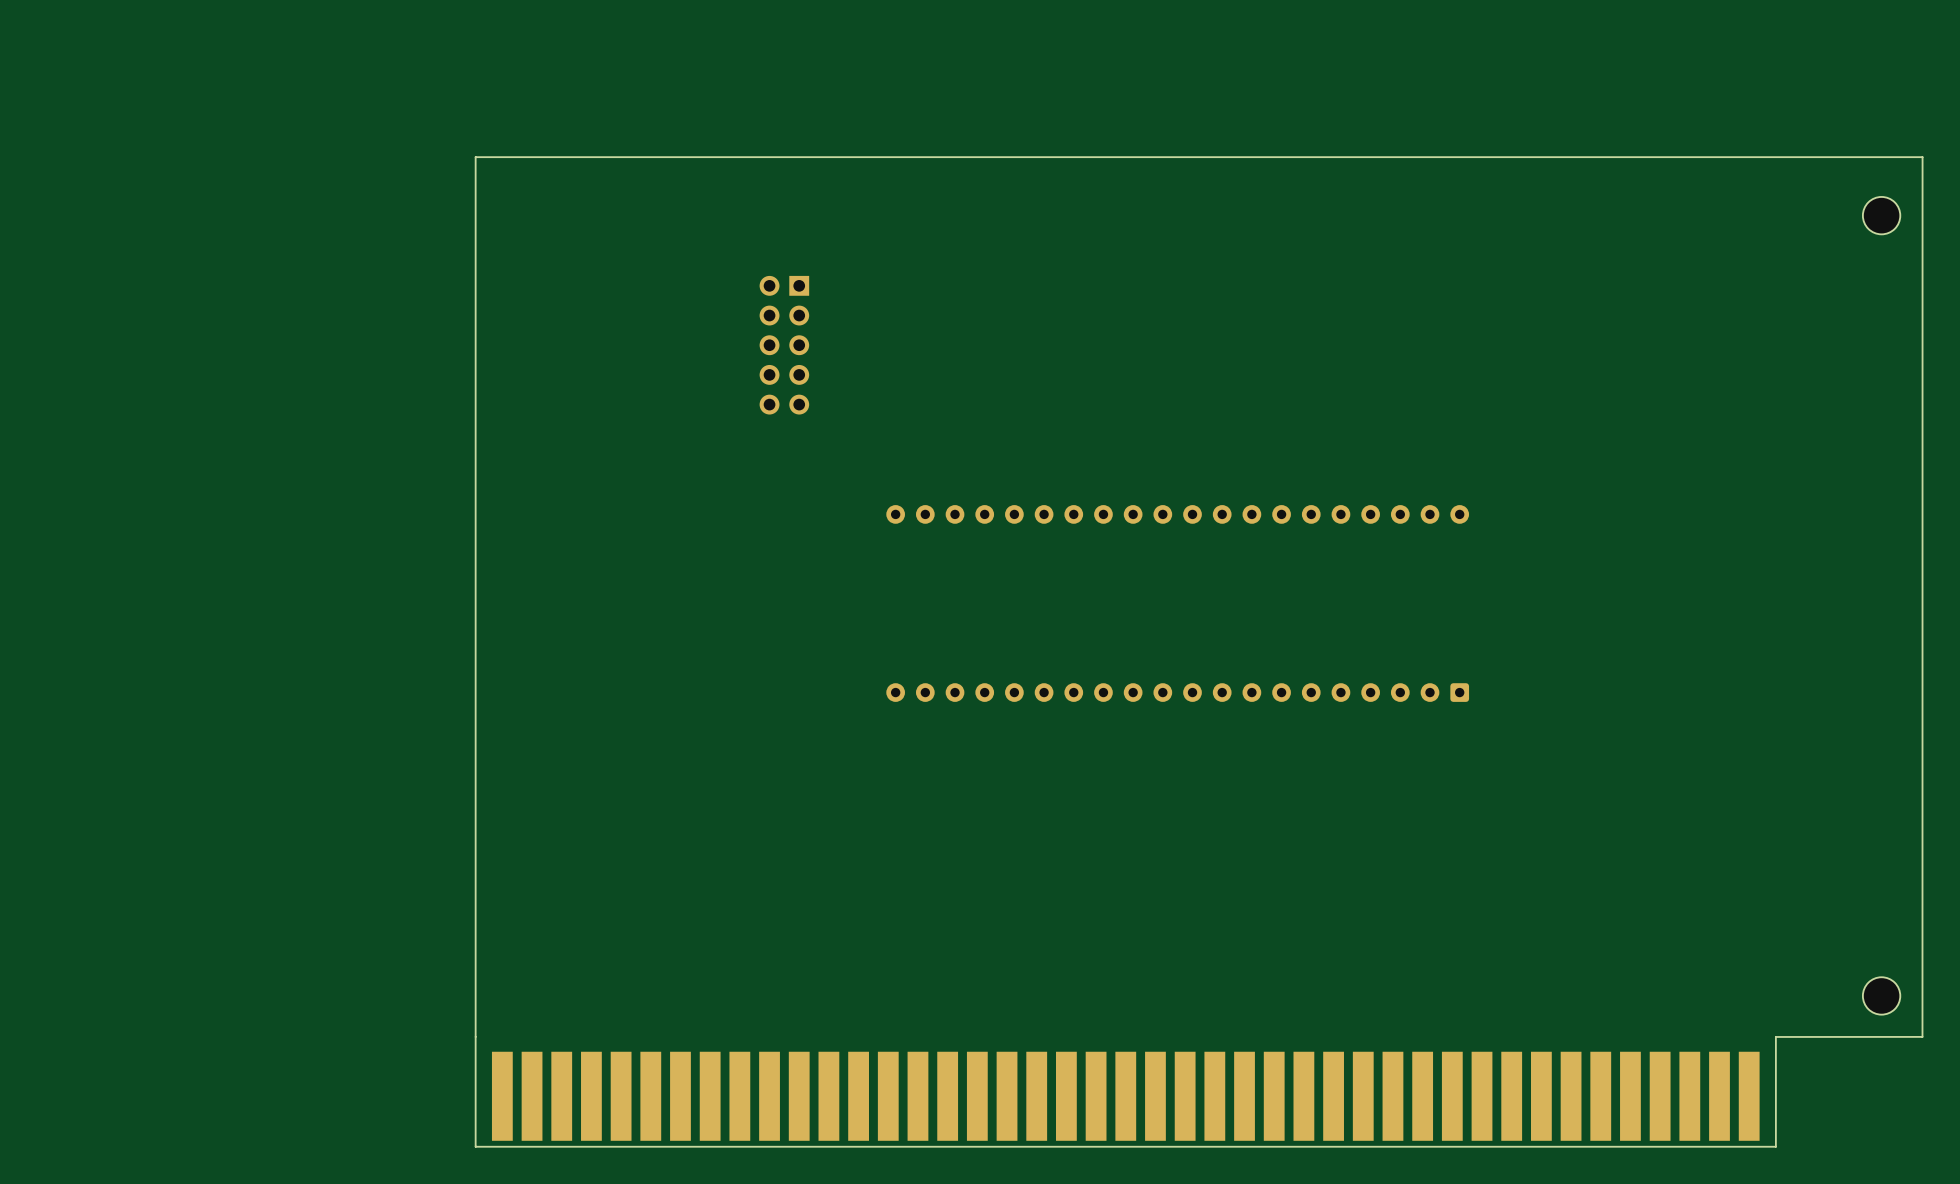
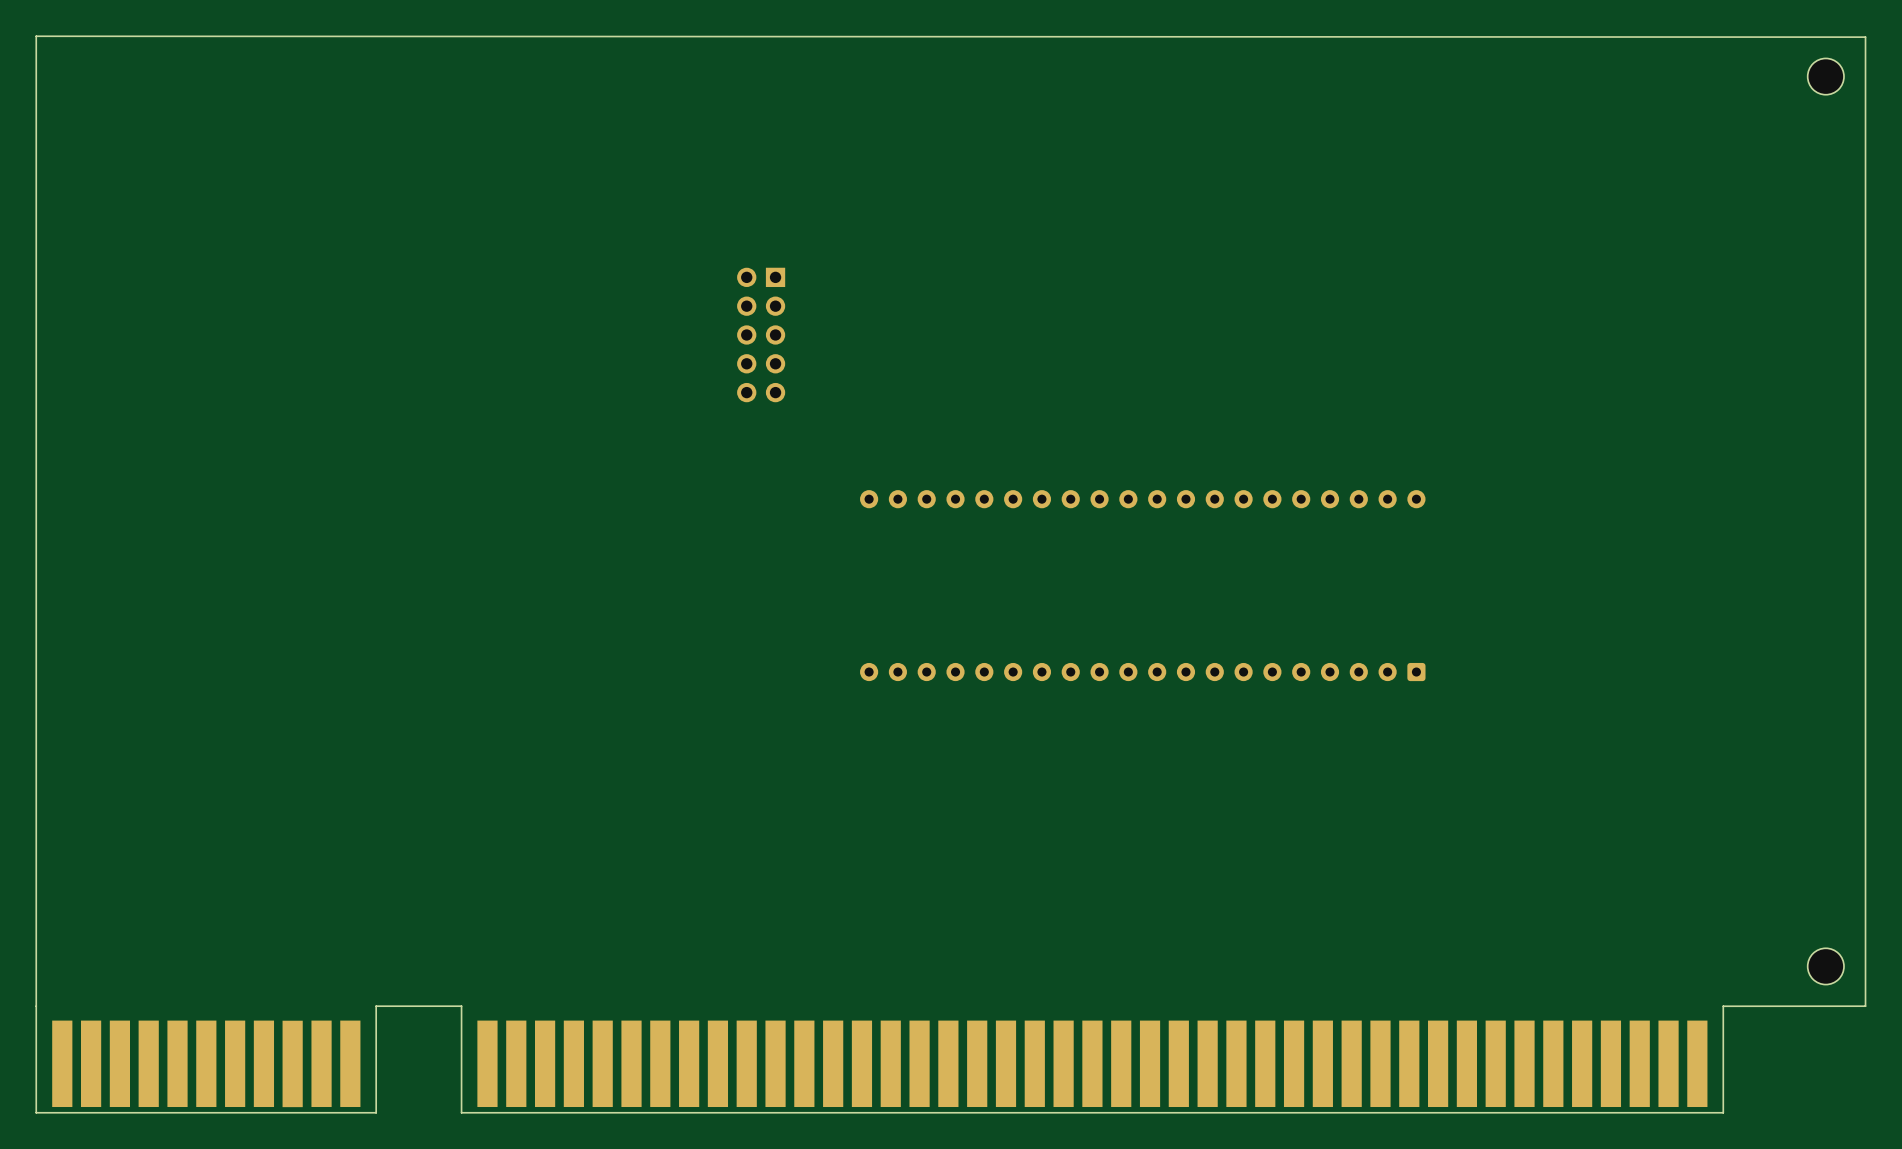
part position: (1881, 215) -> (1825, 76)
board edge: (475, 1036) (475, 157) (1922, 157) (1922, 1036) -> (36, 1006) (36, 36) (1865, 37) (1865, 1006)
part: none -> (879, 1059)
part: (1125, 1091) -> none

